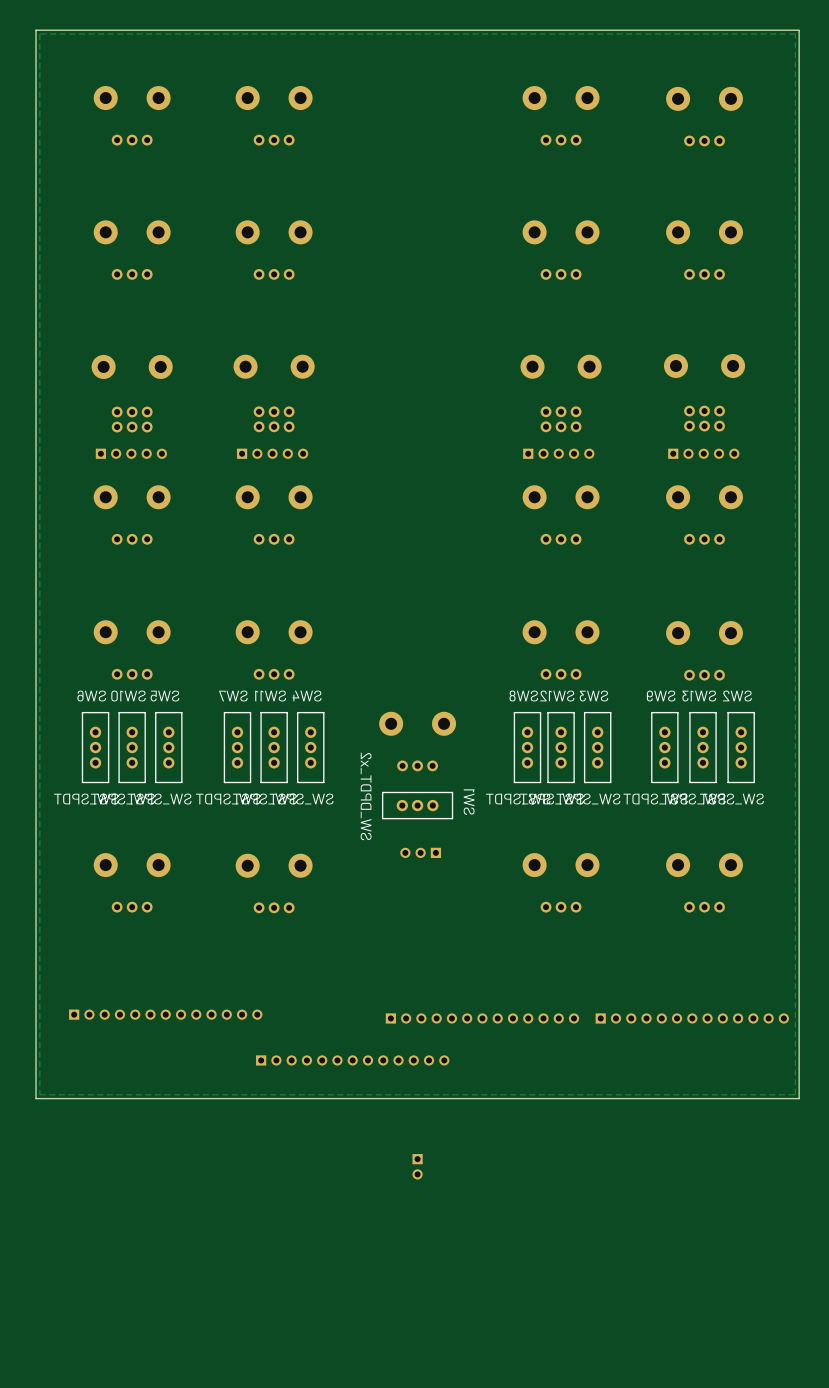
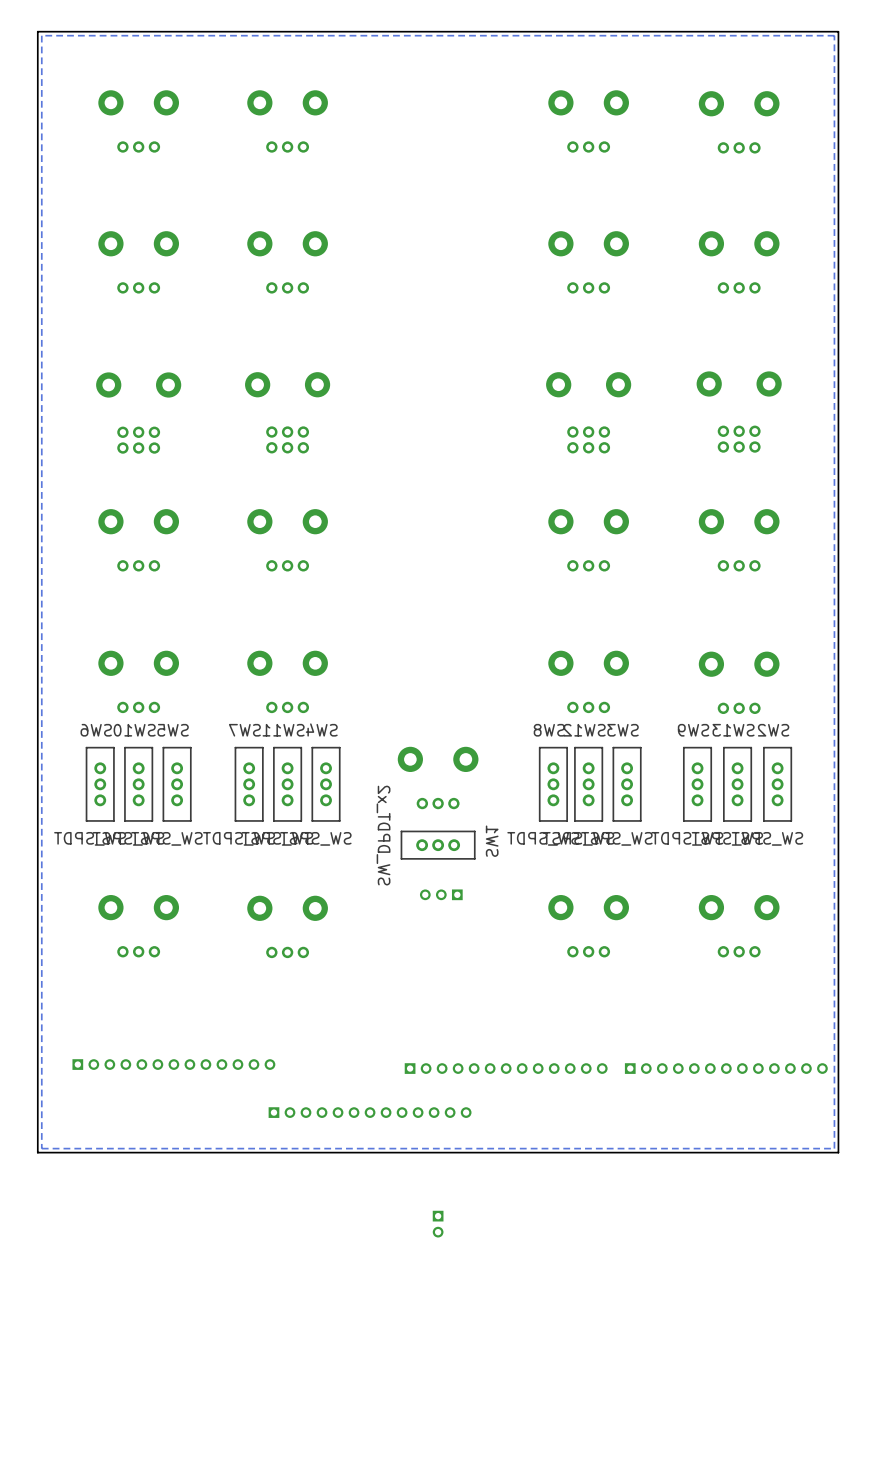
part: (131, 453) -> none
part: (272, 453) -> none
part: (558, 453) -> none
part: (703, 453) -> none

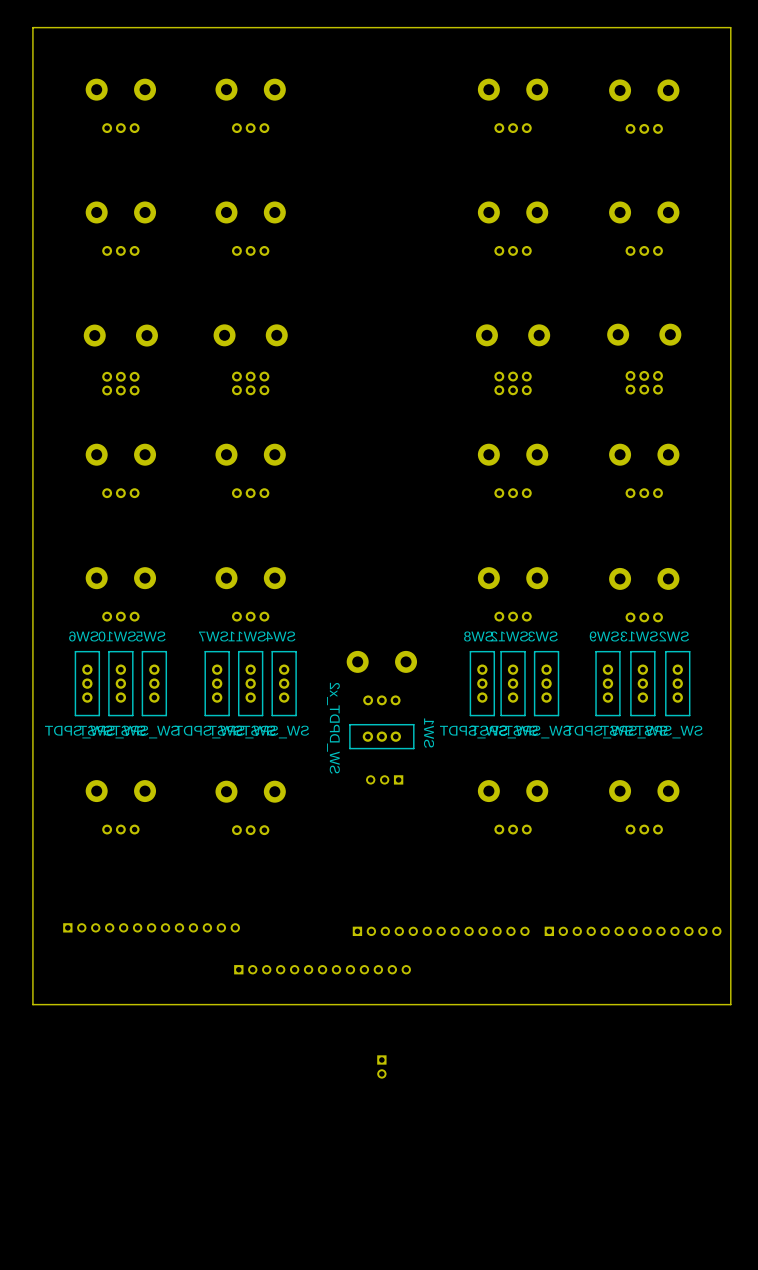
zone outline: (834, 35) (41, 35) (41, 1148) (834, 1148) (834, 35) -> none

